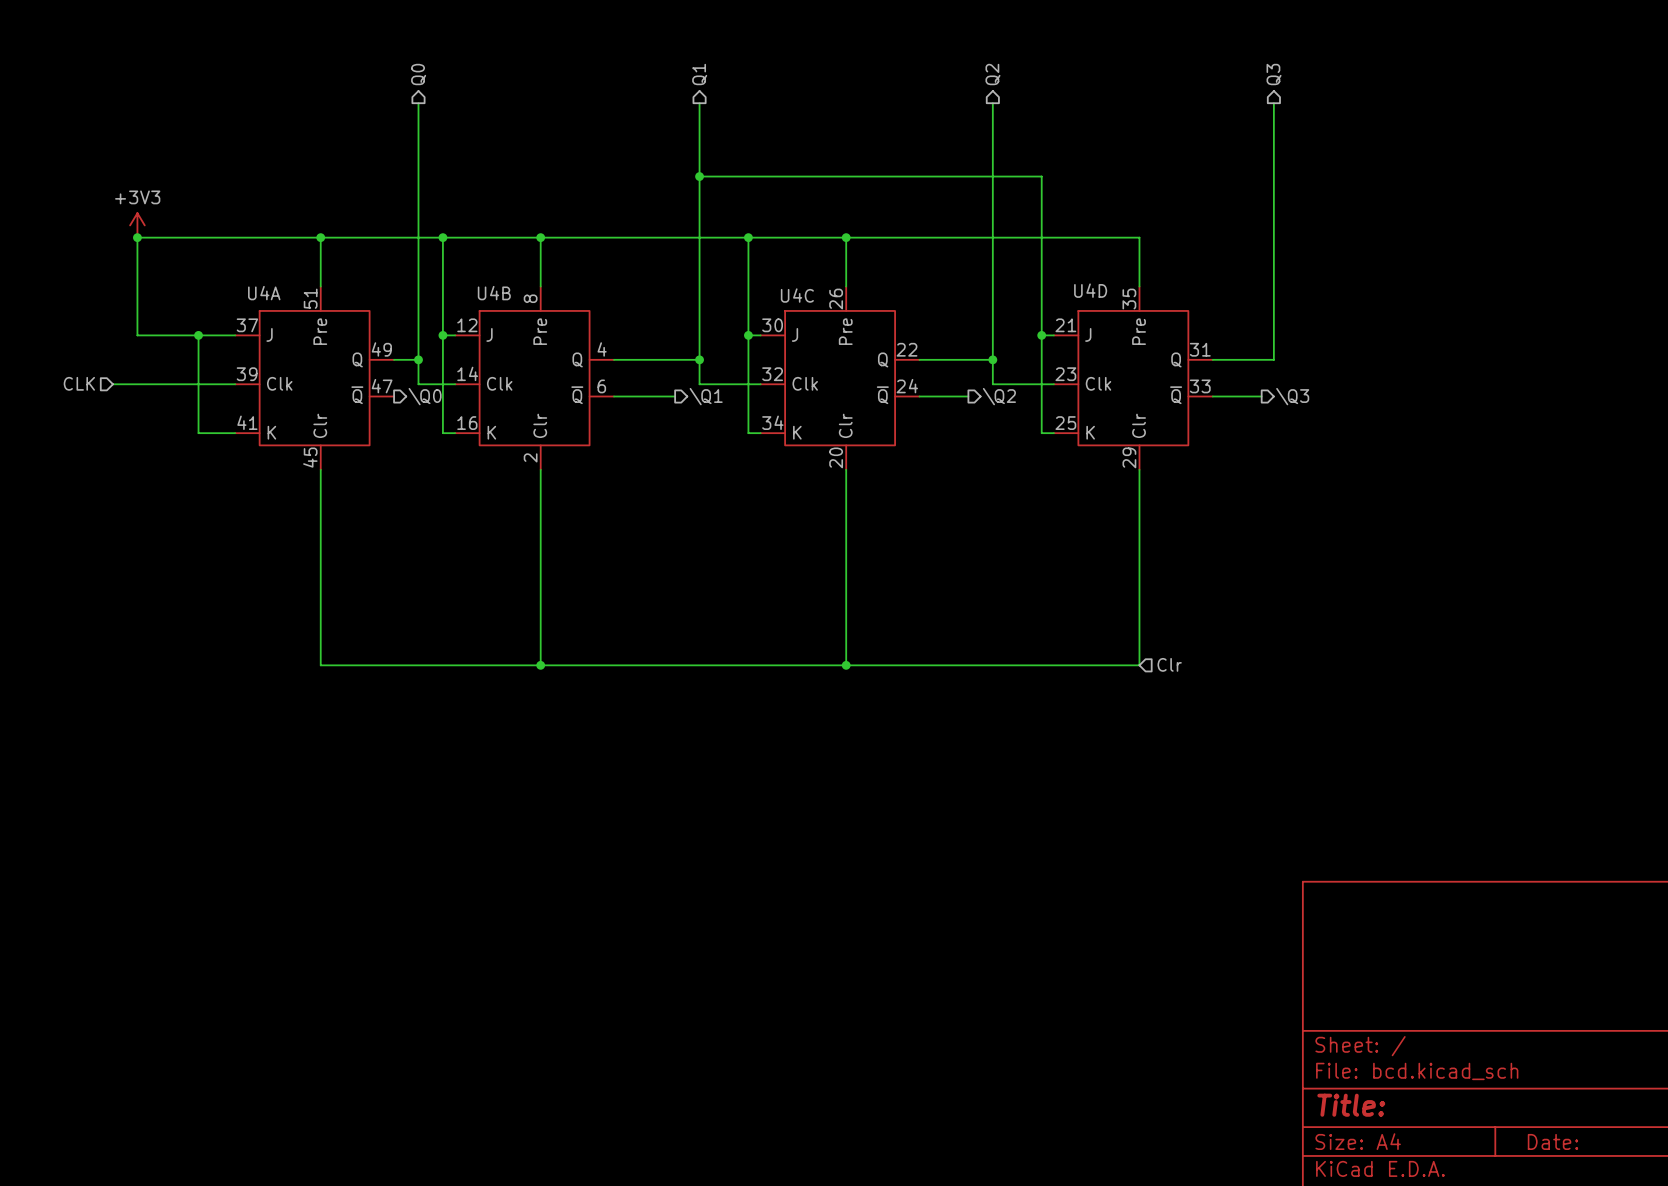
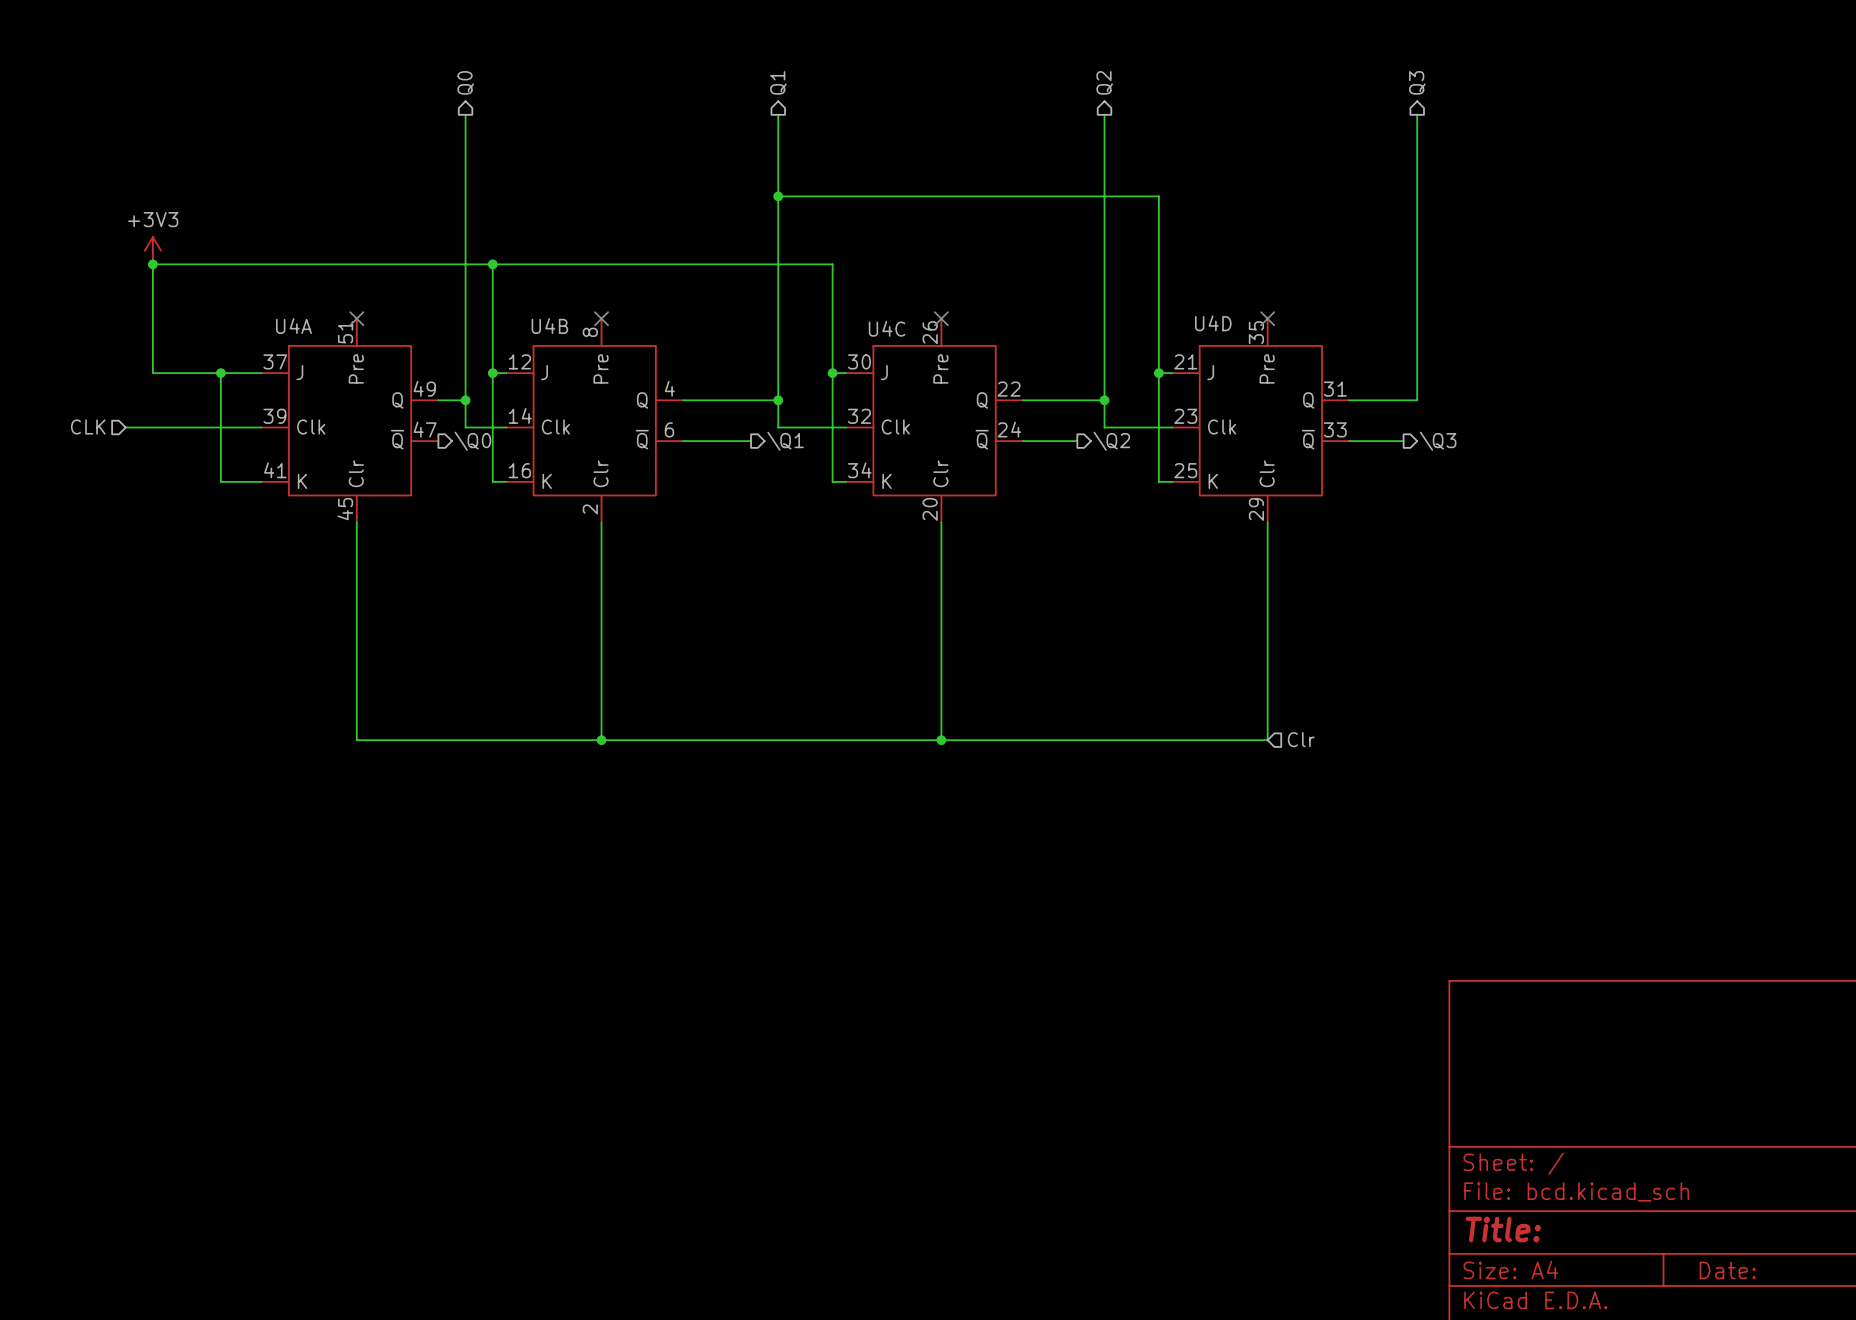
wire: (320, 237) (320, 286) -> none
junction: (320, 237) -> none
wire: (540, 237) (540, 286) -> none
junction: (540, 237) -> none
wire: (748, 237) (1139, 237) (1139, 286) -> none
junction: (748, 237) -> none
wire: (846, 237) (846, 286) -> none
junction: (846, 237) -> none
no-connect mark: none -> (356, 318)
no-connect mark: none -> (601, 318)
no-connect mark: none -> (941, 318)
no-connect mark: none -> (1267, 318)

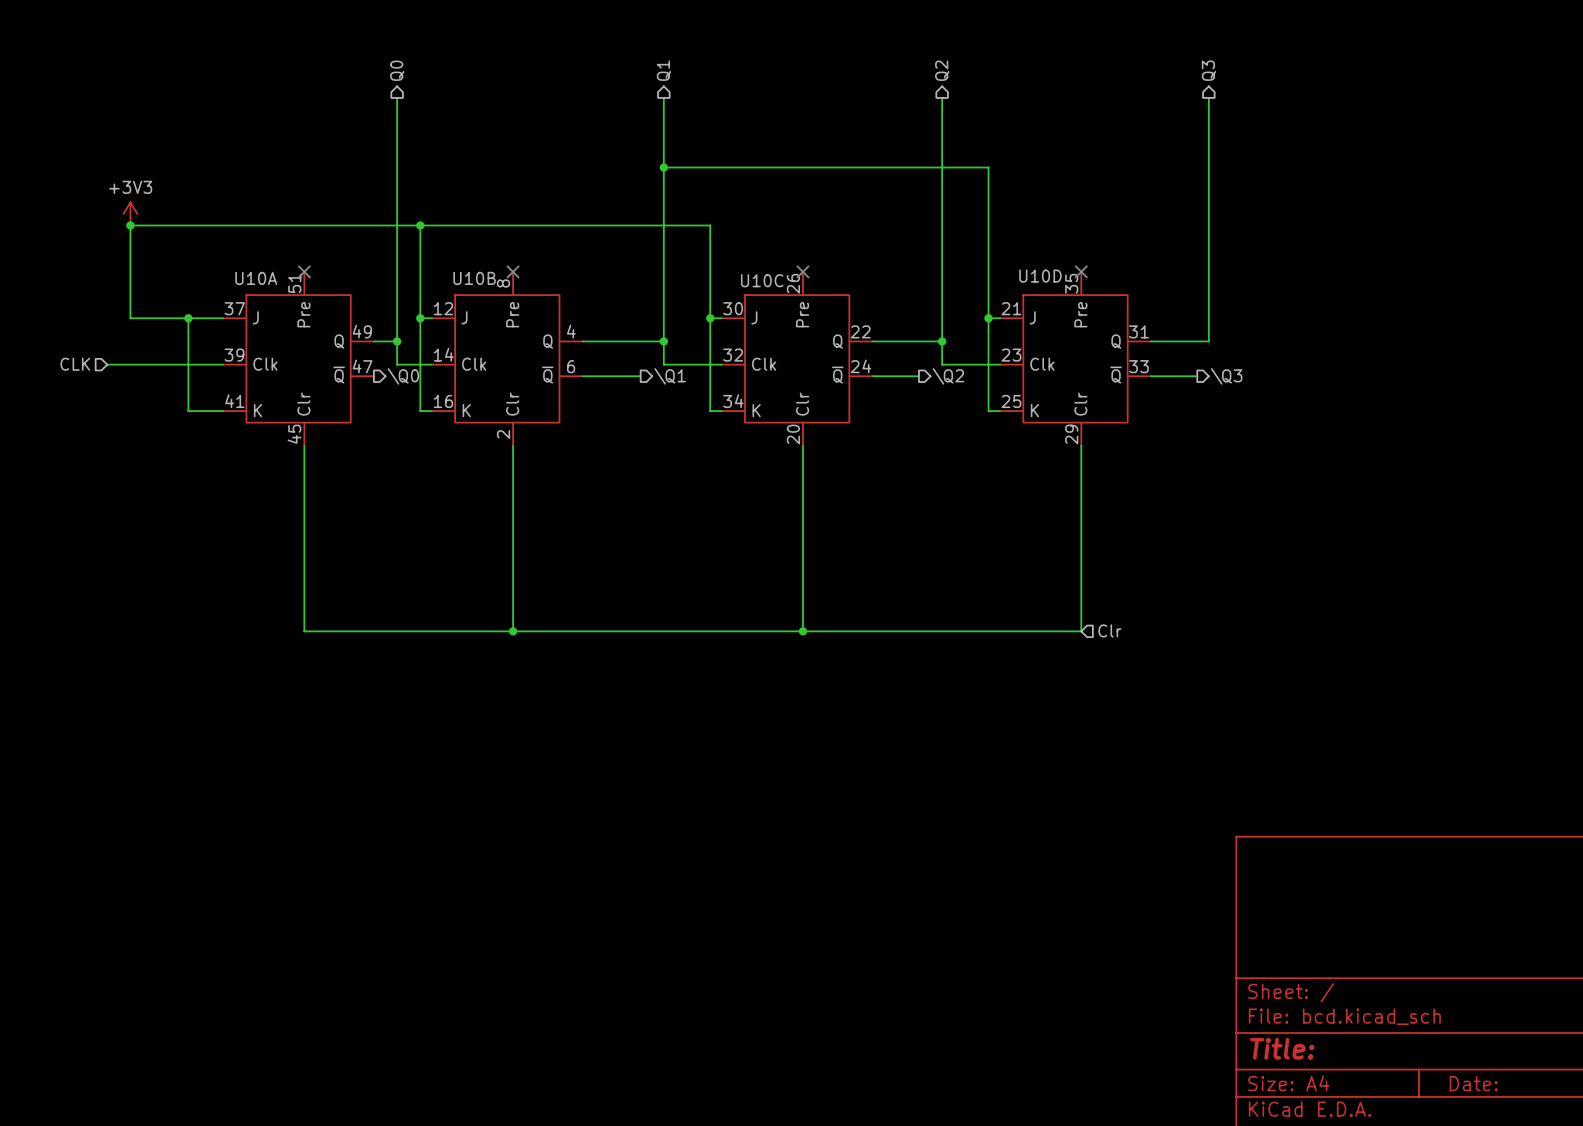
U4D name: U4D (1213, 323) -> U10D (1040, 276)
U4A name: U4A (293, 326) -> U10A (256, 278)
U4B name: U4B (549, 326) -> U10B (474, 278)
U4C name: U4C (887, 328) -> U10C (762, 280)

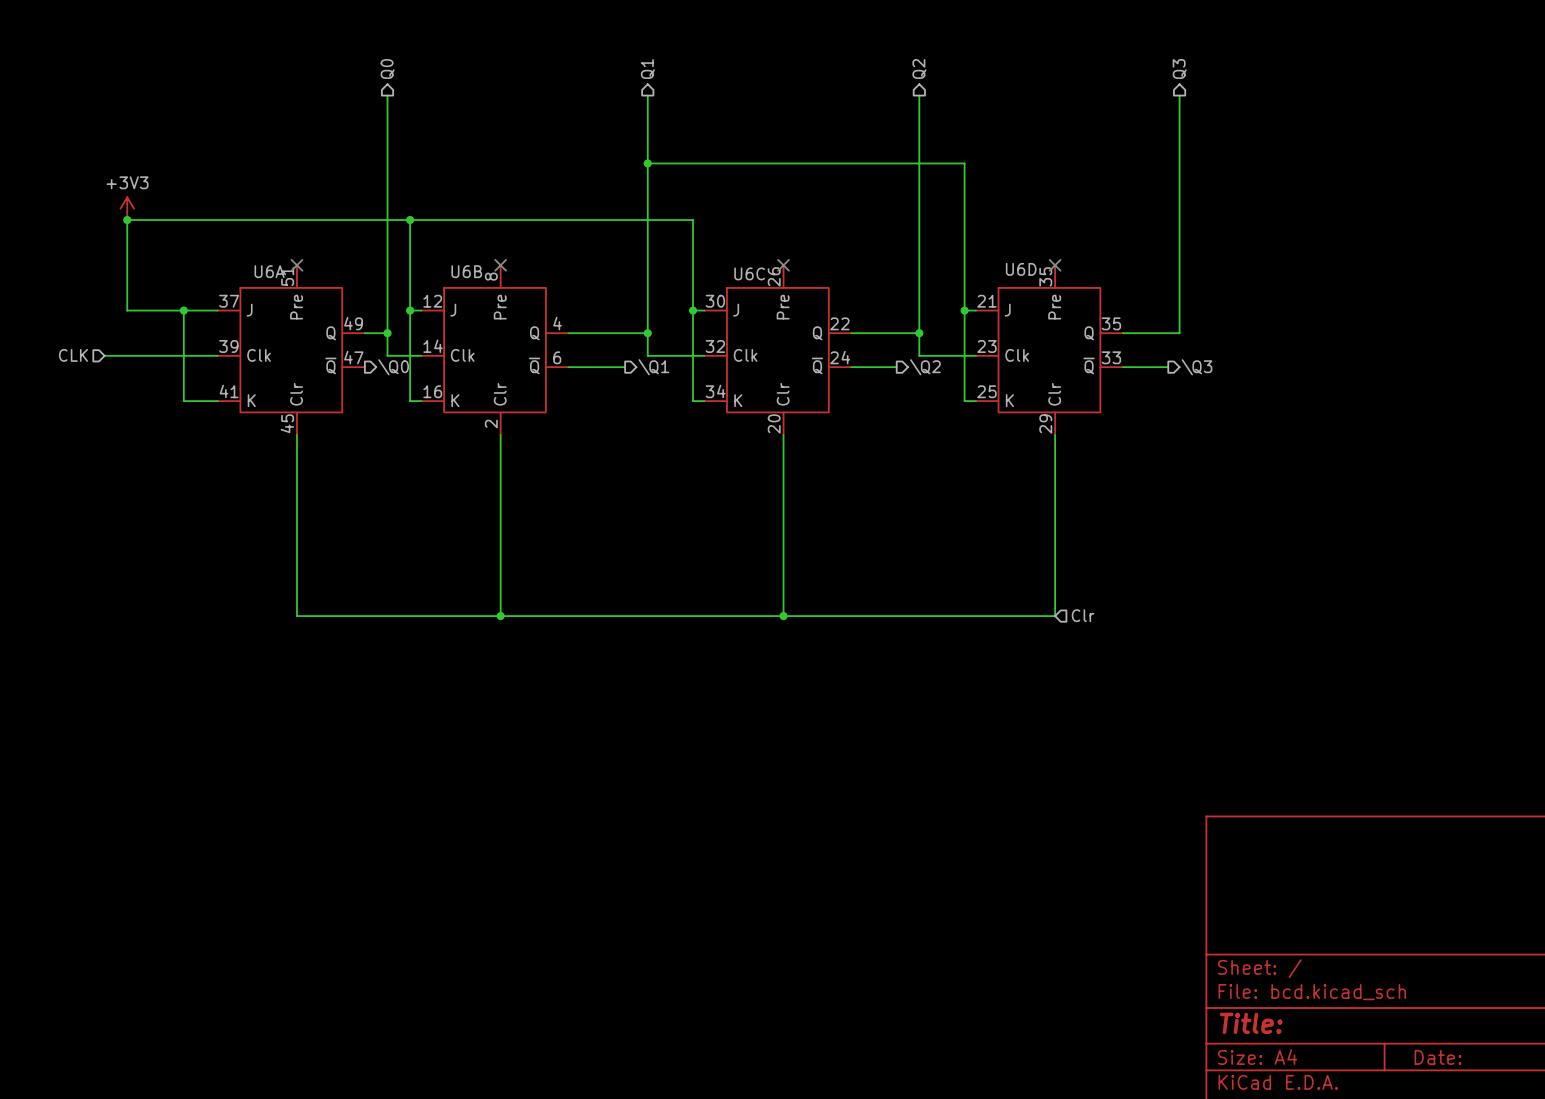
U10D name: U10D (1040, 276) -> U6D (1021, 269)
U10A name: U10A (256, 278) -> U6A (269, 271)
U10B name: U10B (474, 278) -> U6B (466, 271)
U10C name: U10C (762, 280) -> U6C (749, 273)
U10D pin number: 31 (1138, 331) -> 35 (1111, 323)

